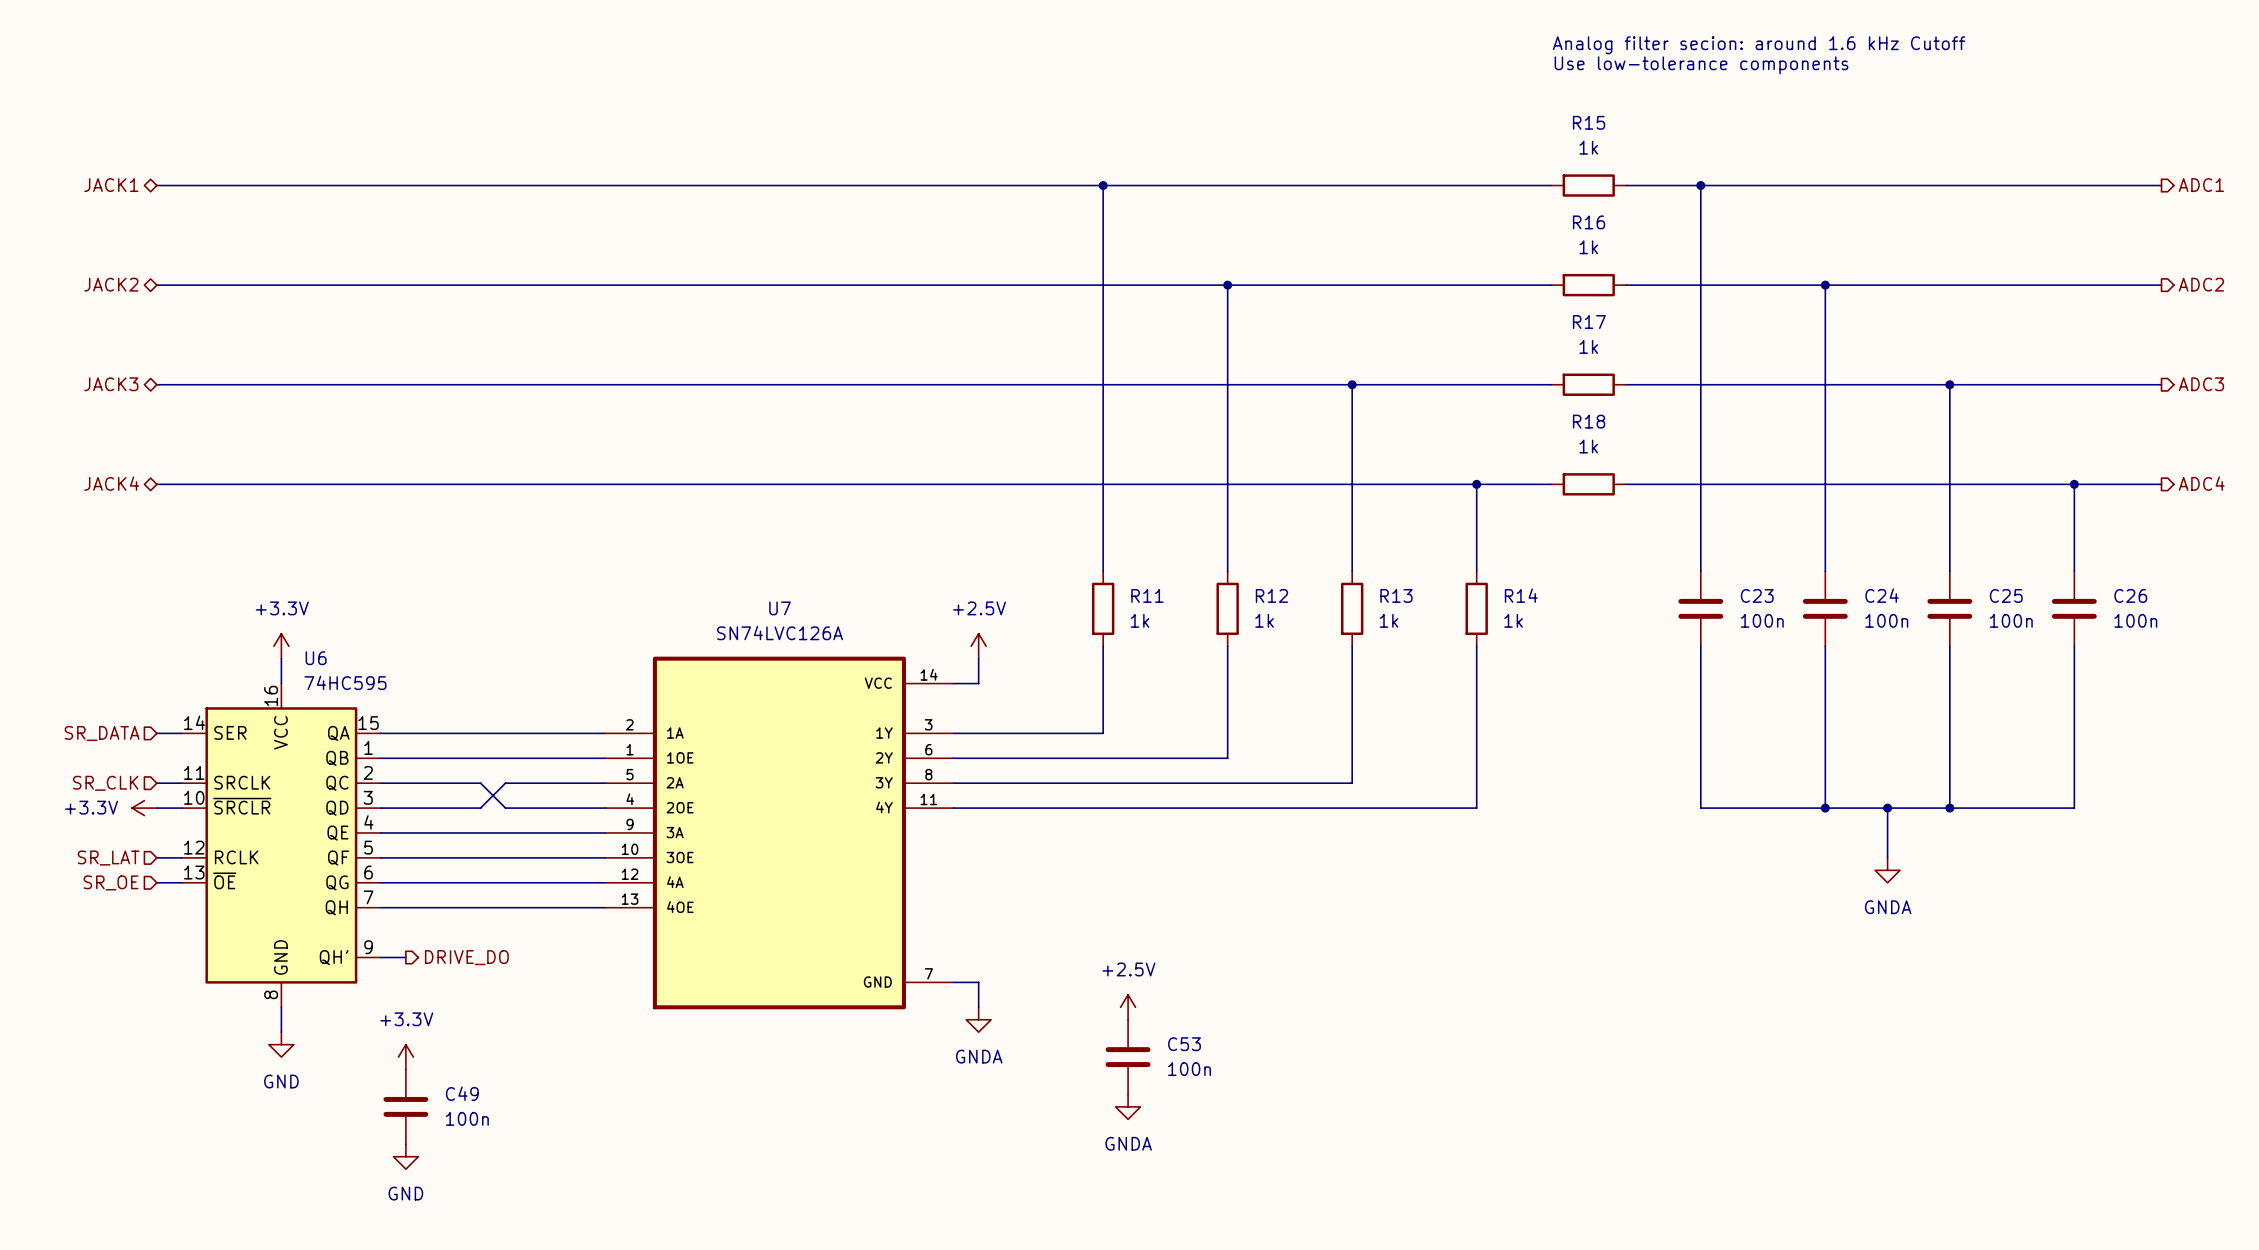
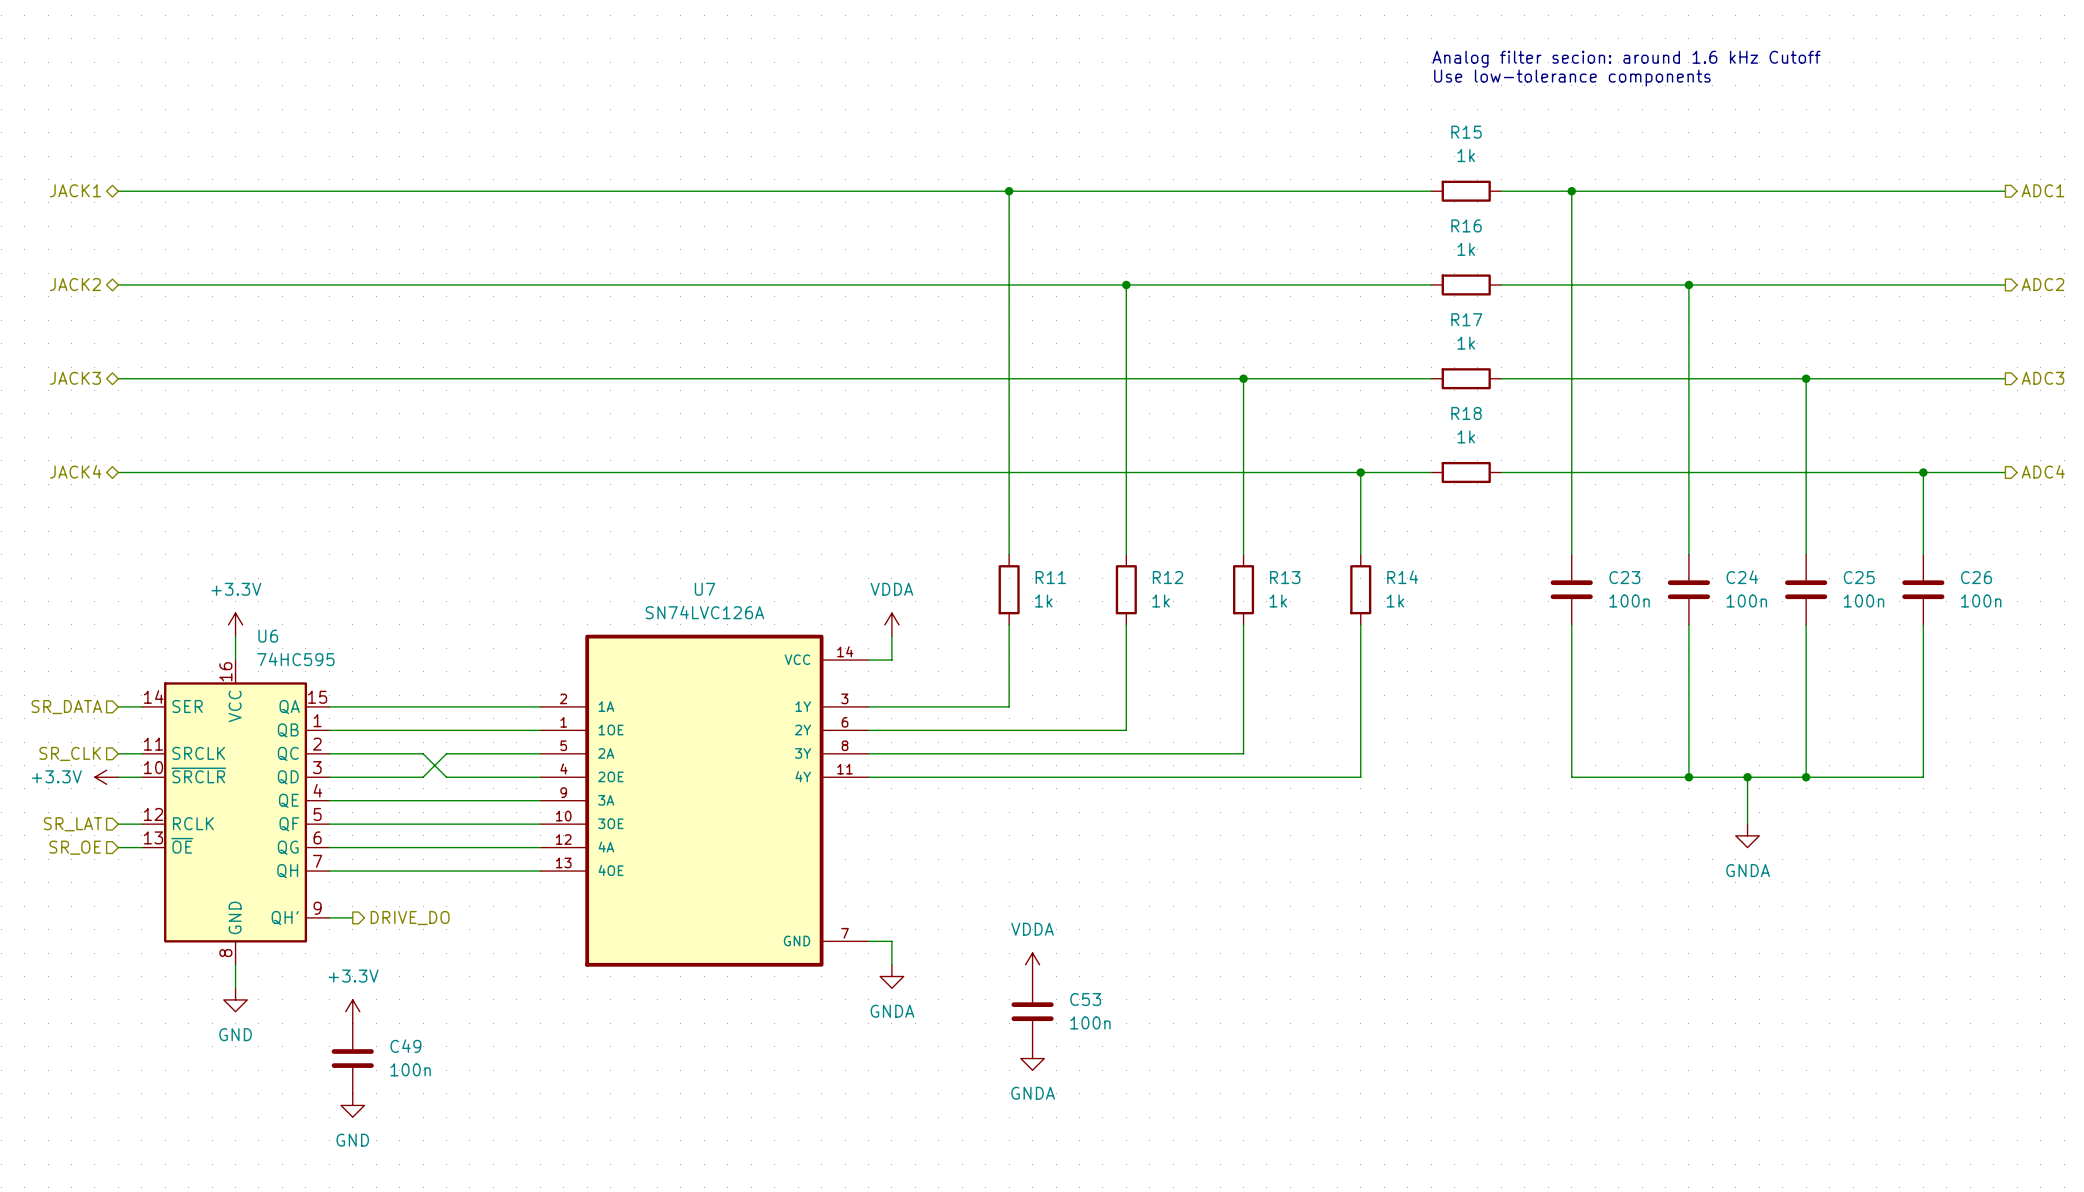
power symbol: +2.5V (978, 646) -> VDDA (891, 624)
power symbol: +2.5V (1128, 1007) -> VDDA (1032, 964)

